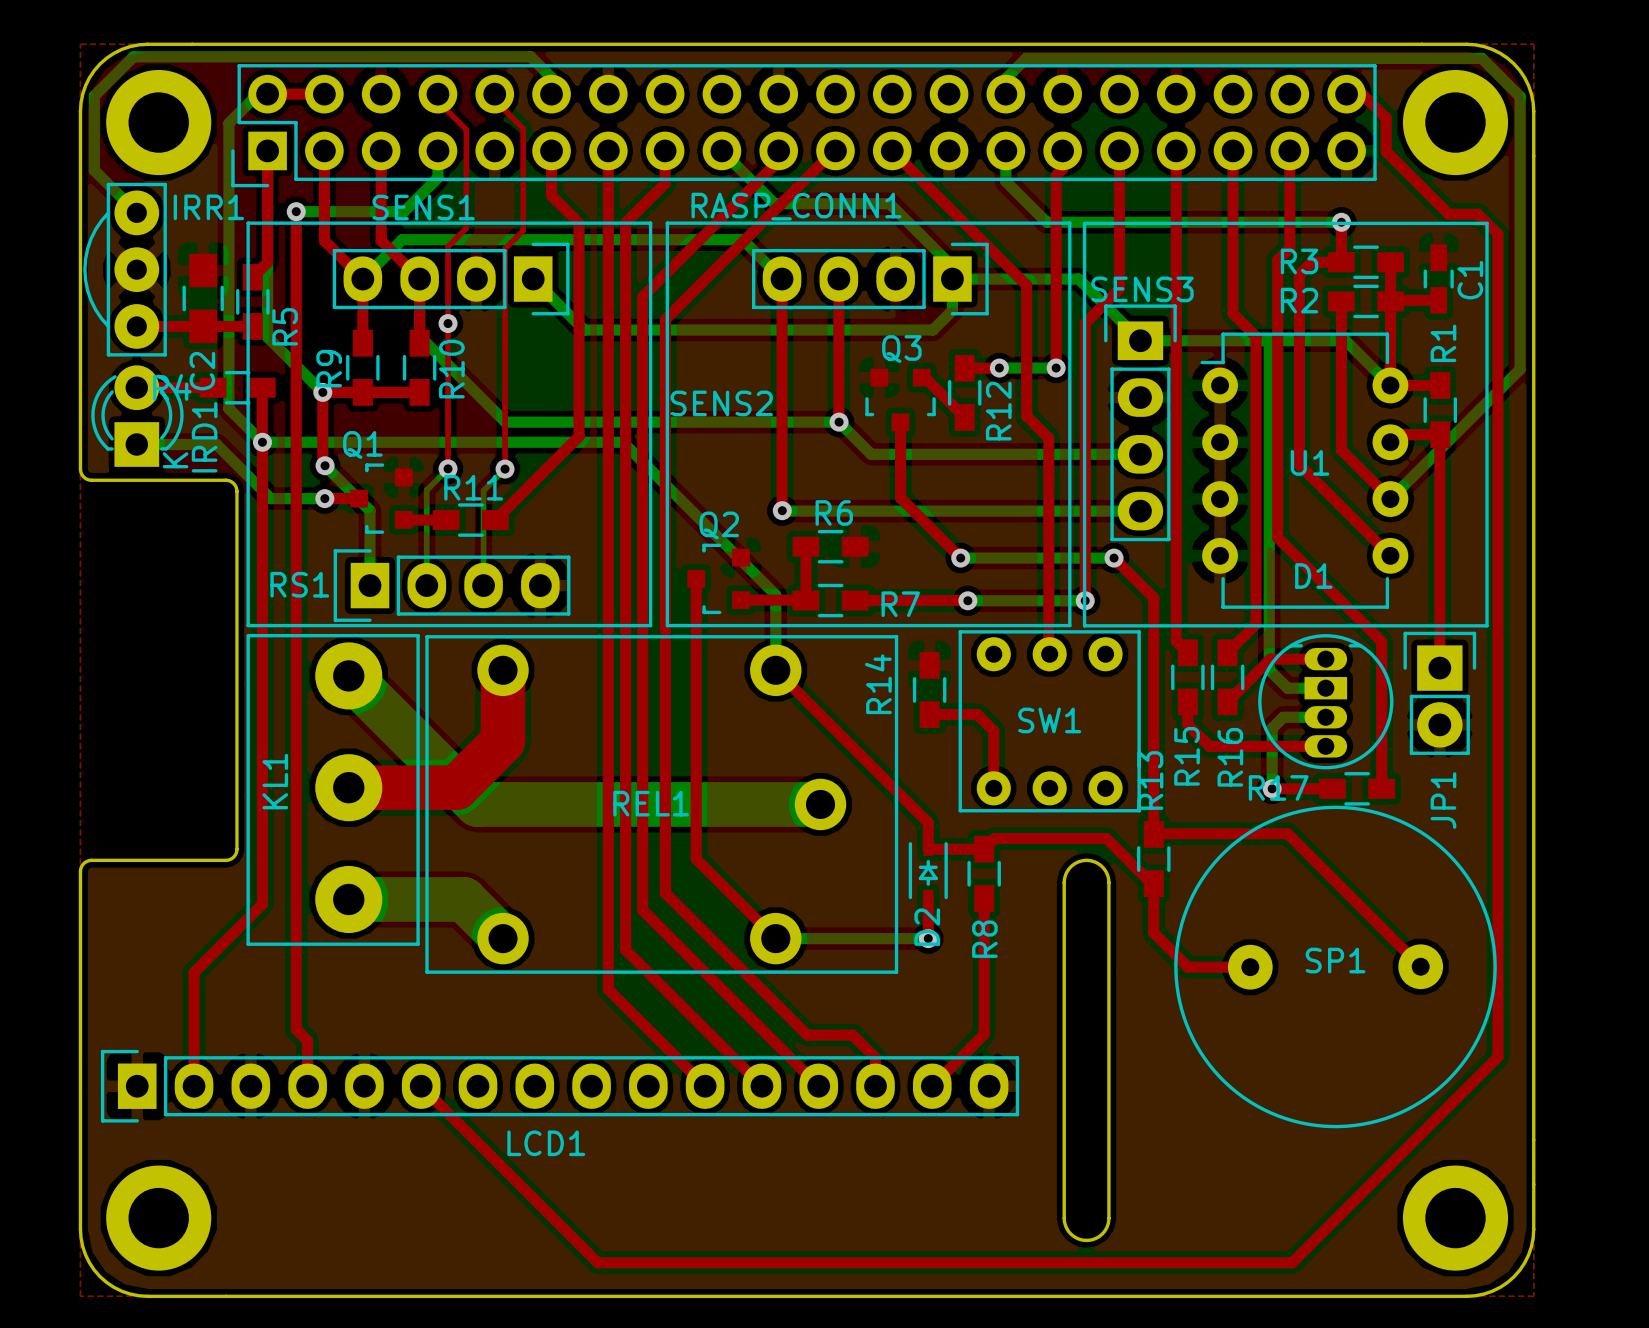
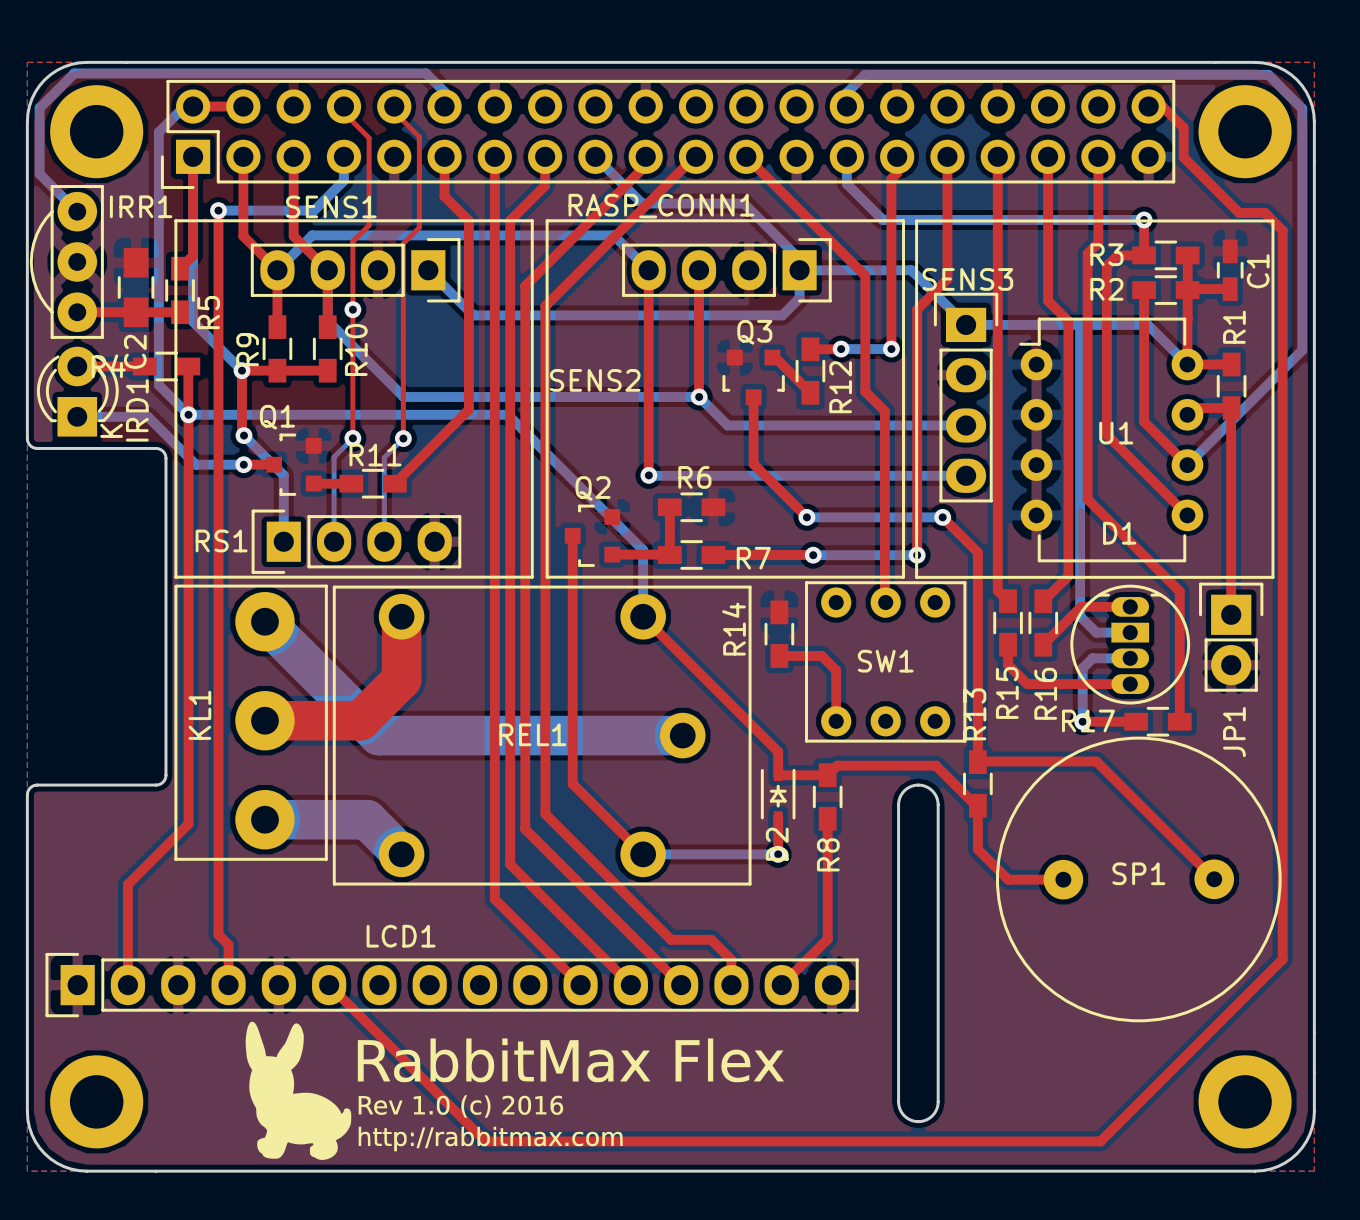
drawing: none -> [245, 1021, 784, 1160]
LCD1 name position: LCD1 (546, 1143) -> LCD1 (401, 936)

